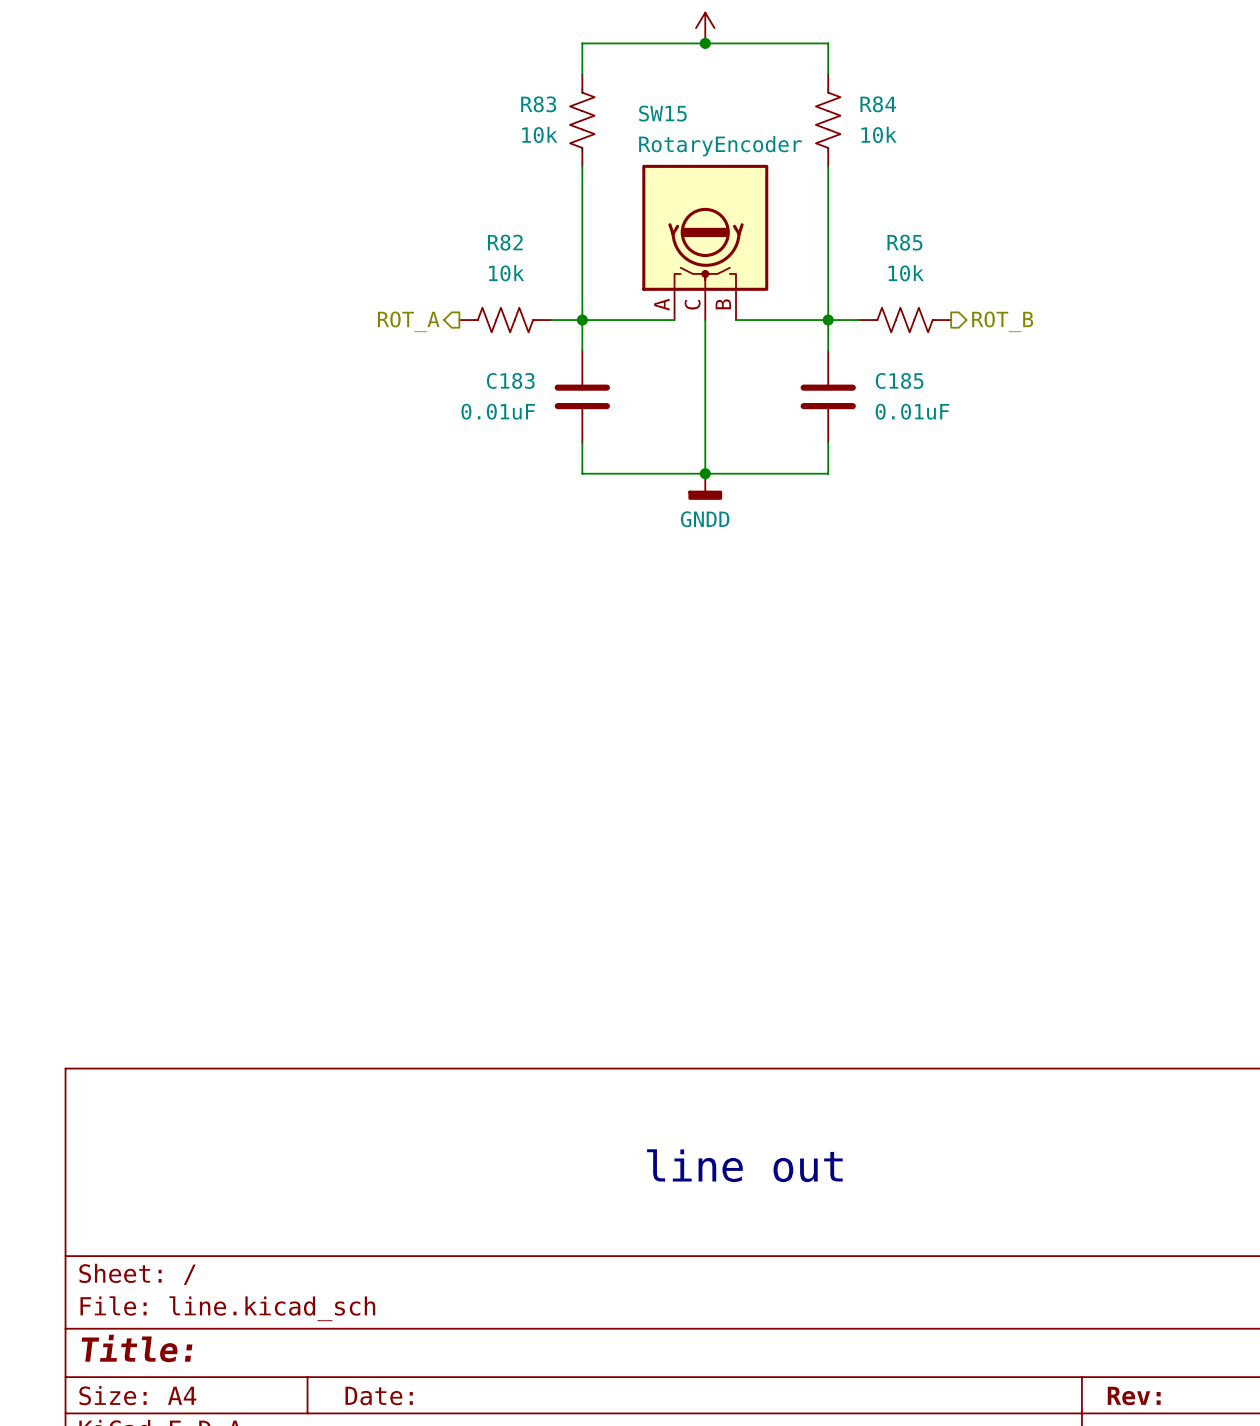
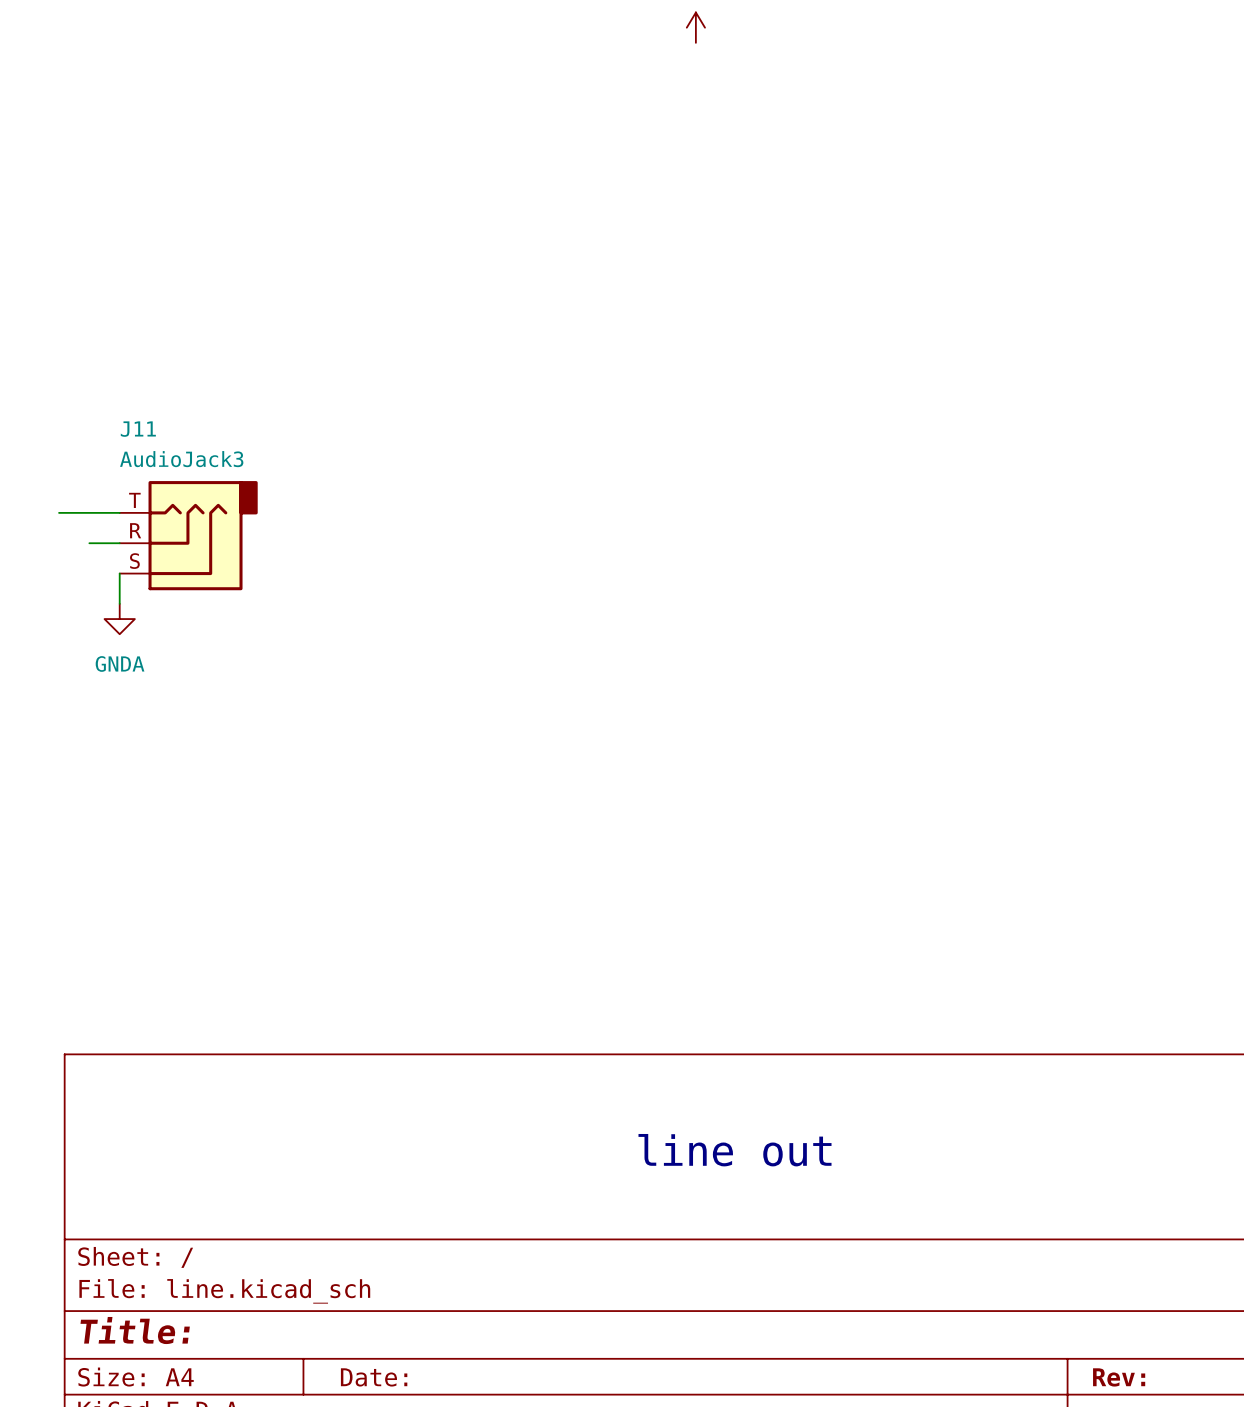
junction: (705, 43) -> none
wire: (582, 74) (582, 43) (828, 43) (828, 74) -> none
R83: 10k (582, 120) -> none
R84: 10k (828, 120) -> none
wire: (582, 166) (582, 350) -> none
wire: (828, 166) (828, 350) -> none
SW15: RotaryEncoder (705, 242) -> none
R82: 10k (505, 320) -> none
wire: (551, 320) (674, 320) -> none
junction: (582, 320) -> none
wire: (705, 320) (705, 473) -> none
wire: (736, 320) (858, 320) -> none
junction: (828, 320) -> none
R85: 10k (905, 320) -> none
hierarchical label: ROT_A (408, 321) -> none
hierarchical label: ROT_B (1002, 321) -> none
C183: 0.01uF (582, 396) -> none
C185: 0.01uF (828, 396) -> none
wire: (582, 442) (582, 473) (828, 473) (828, 442) -> none
junction: (705, 473) -> none
power symbol: GNDD (705, 486) -> none
wire: none -> (59, 512) (119, 512)
J11: none -> AudioJack3 (188, 535)
wire: none -> (89, 543) (119, 543)
wire: none -> (119, 573) (119, 603)
power symbol: none -> GNDA (119, 619)

